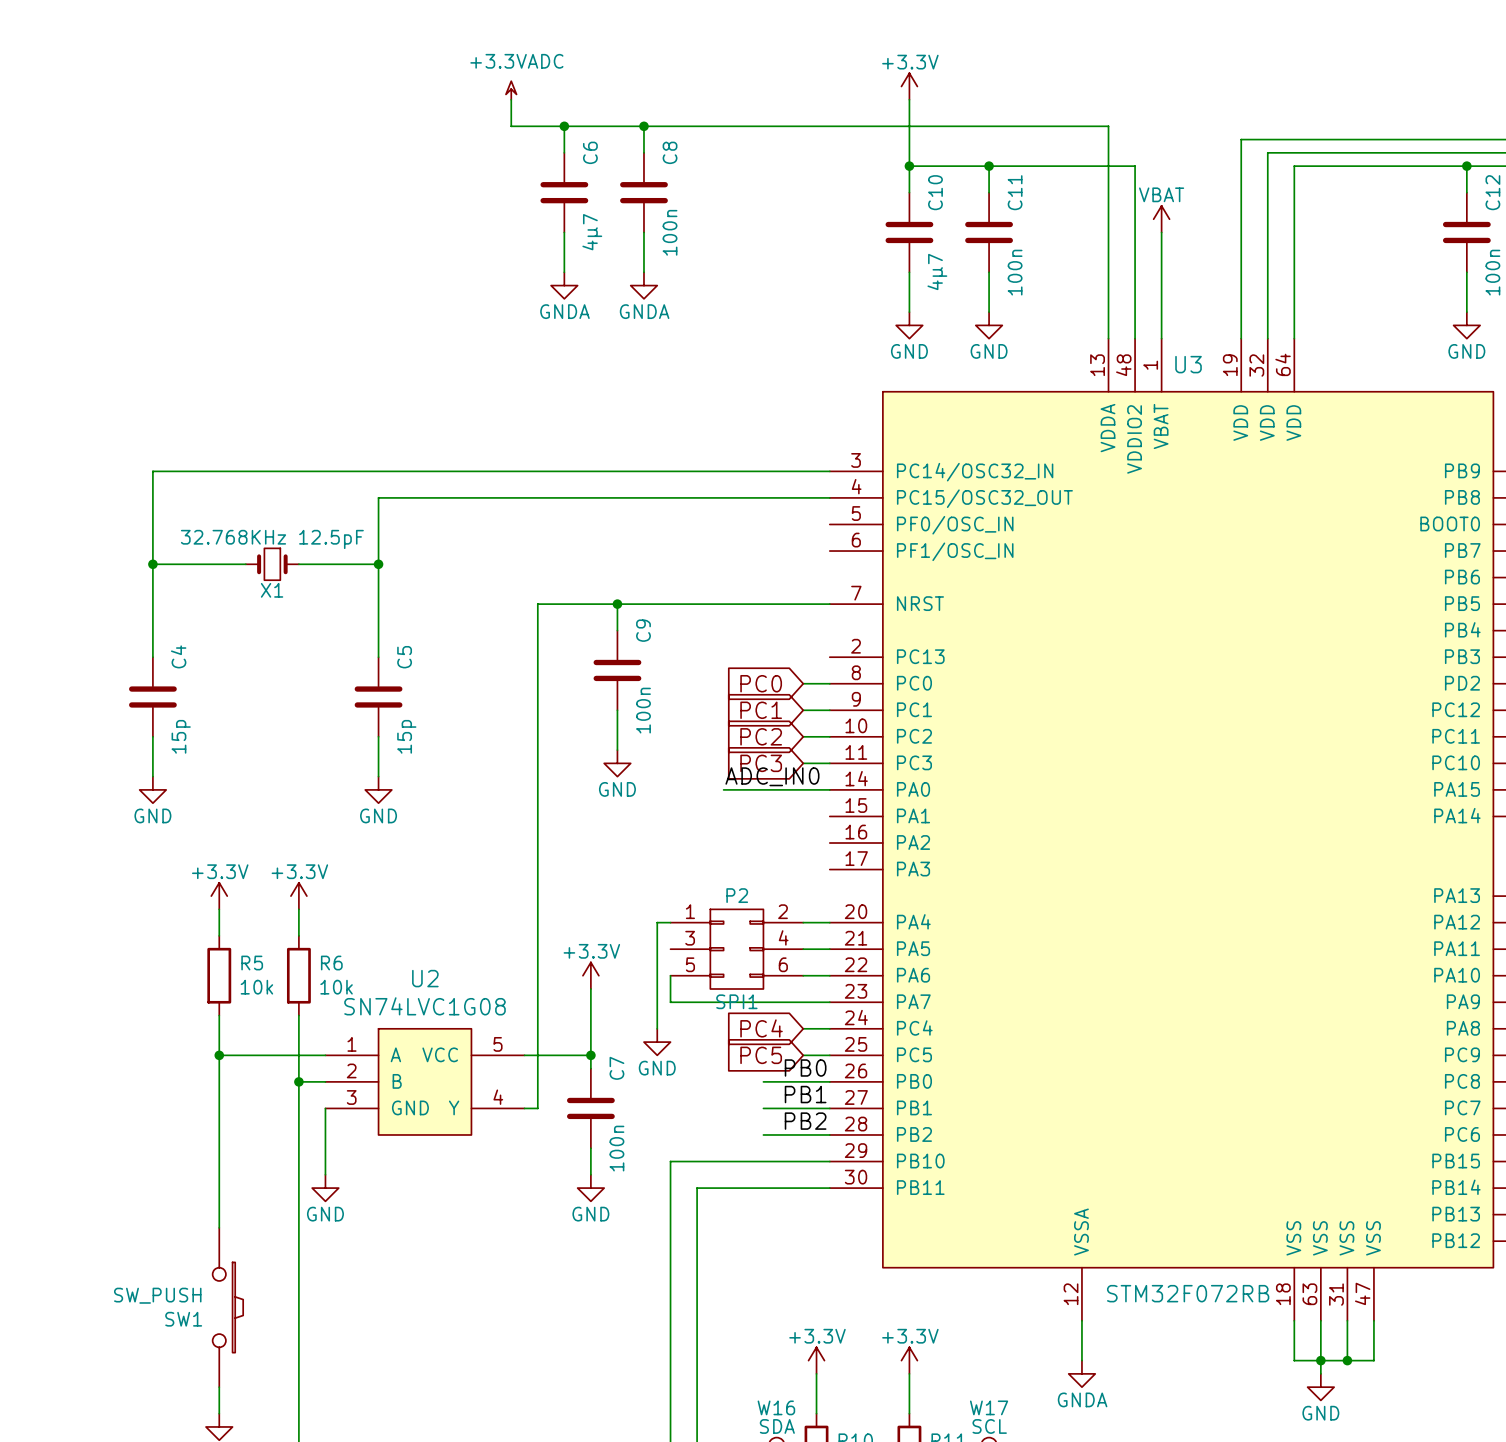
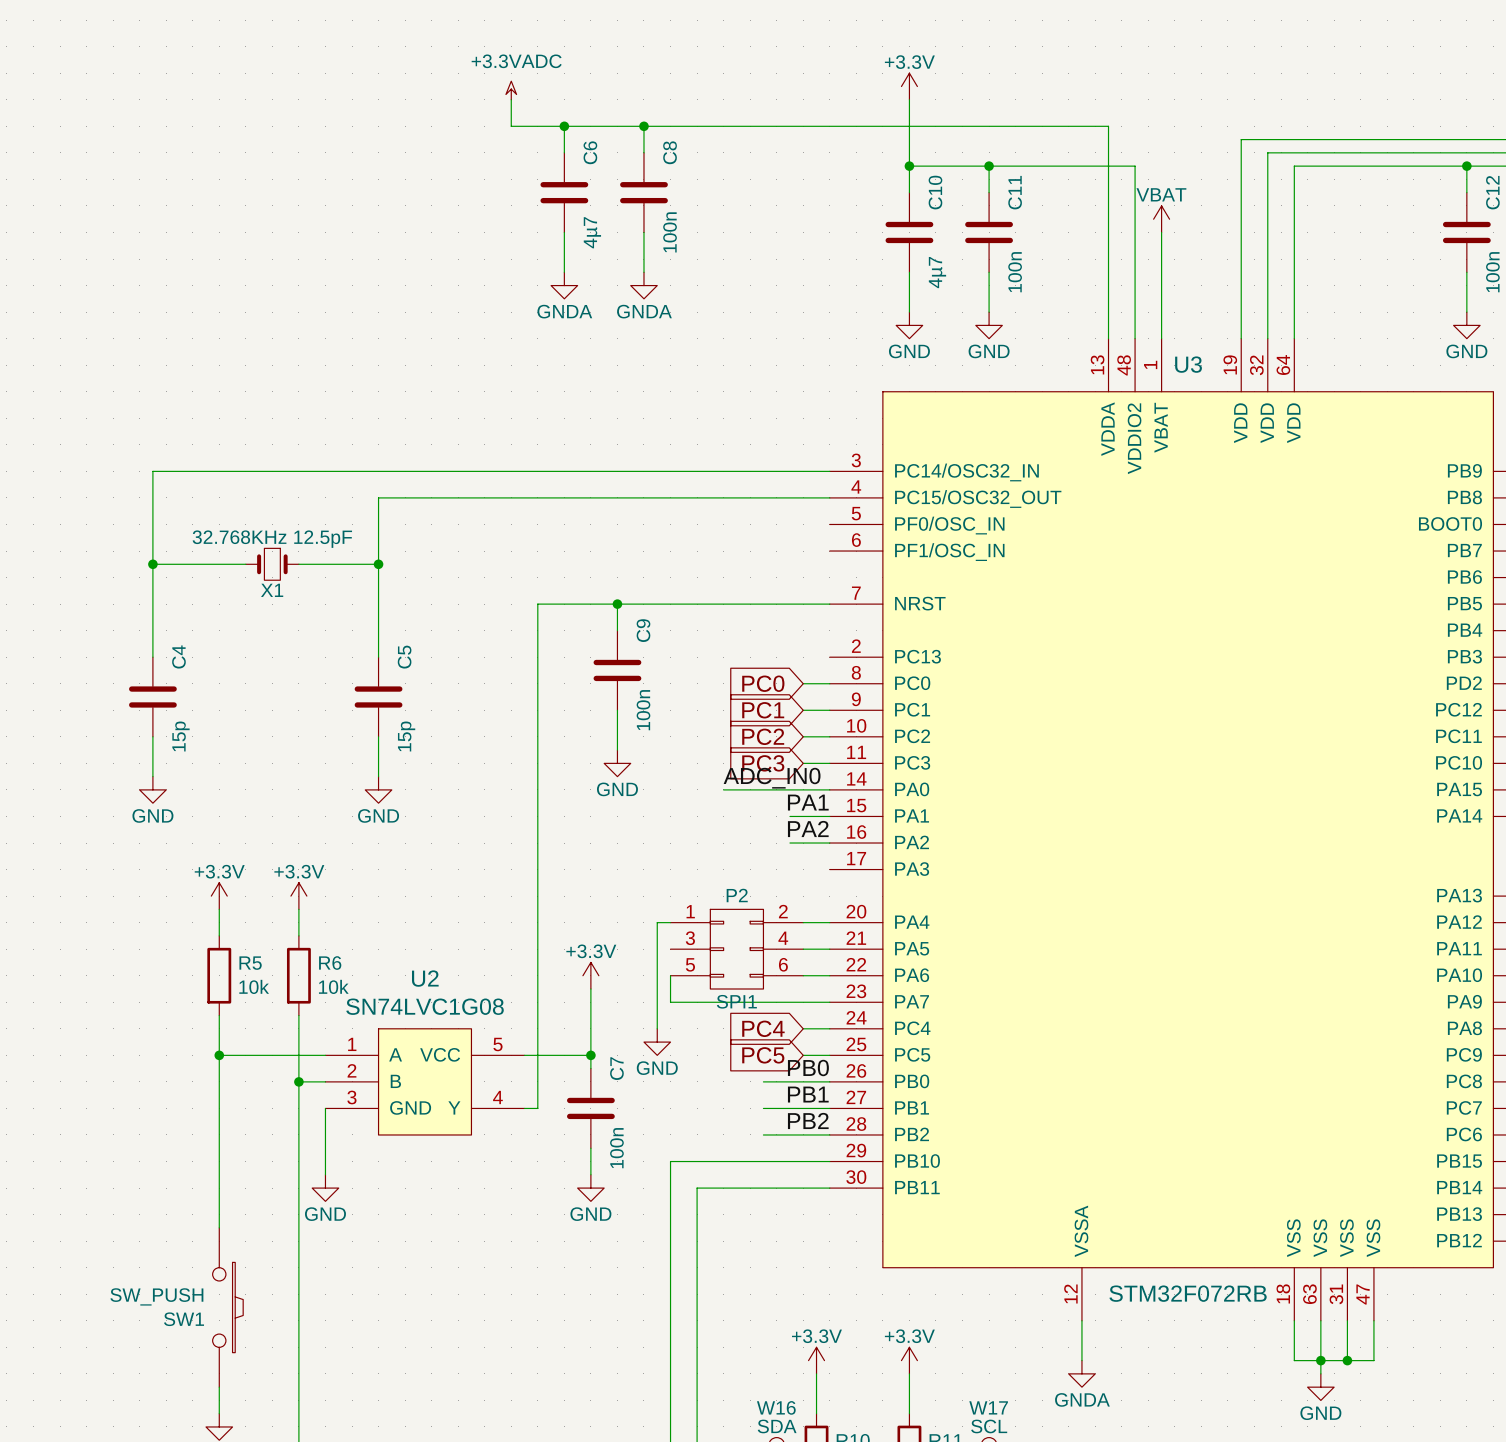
label: none -> PA1 (808, 802)
wire: none -> (789, 816) (829, 816)
label: none -> PA2 (808, 828)
wire: none -> (789, 843) (829, 843)

